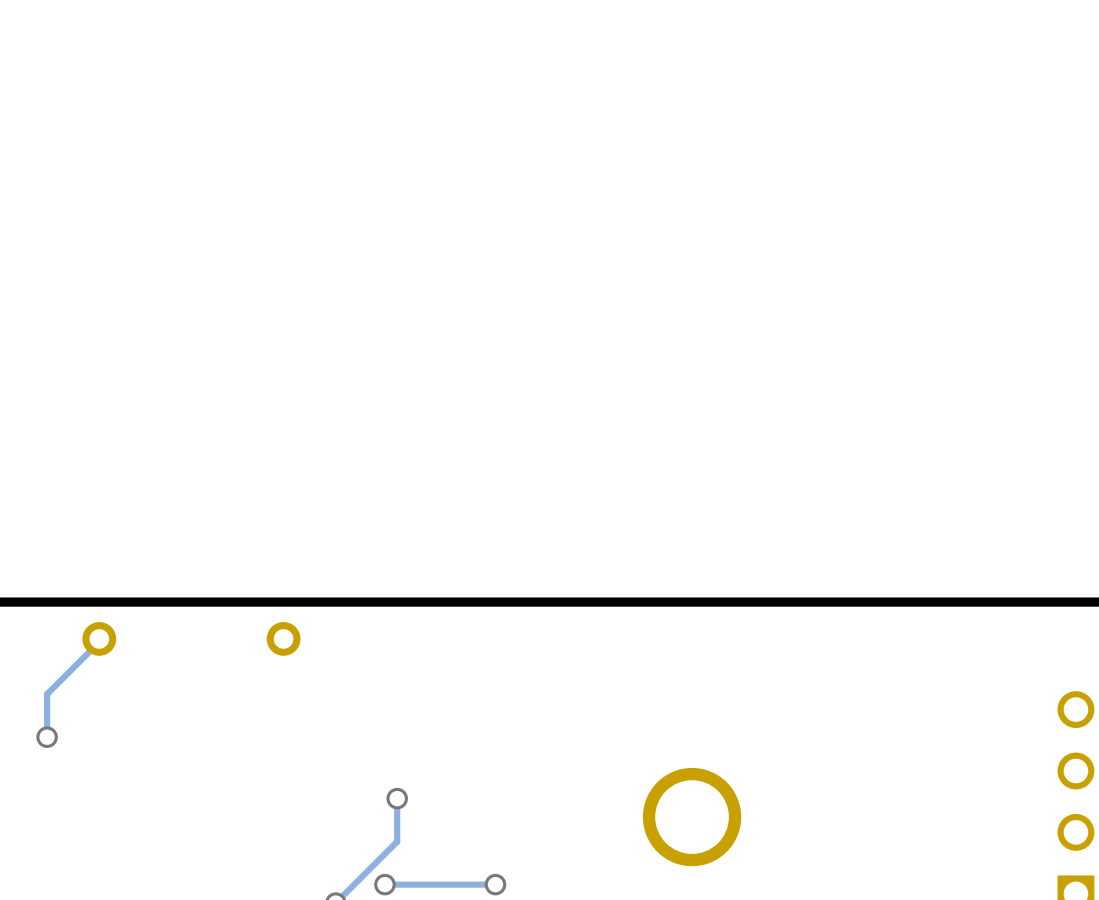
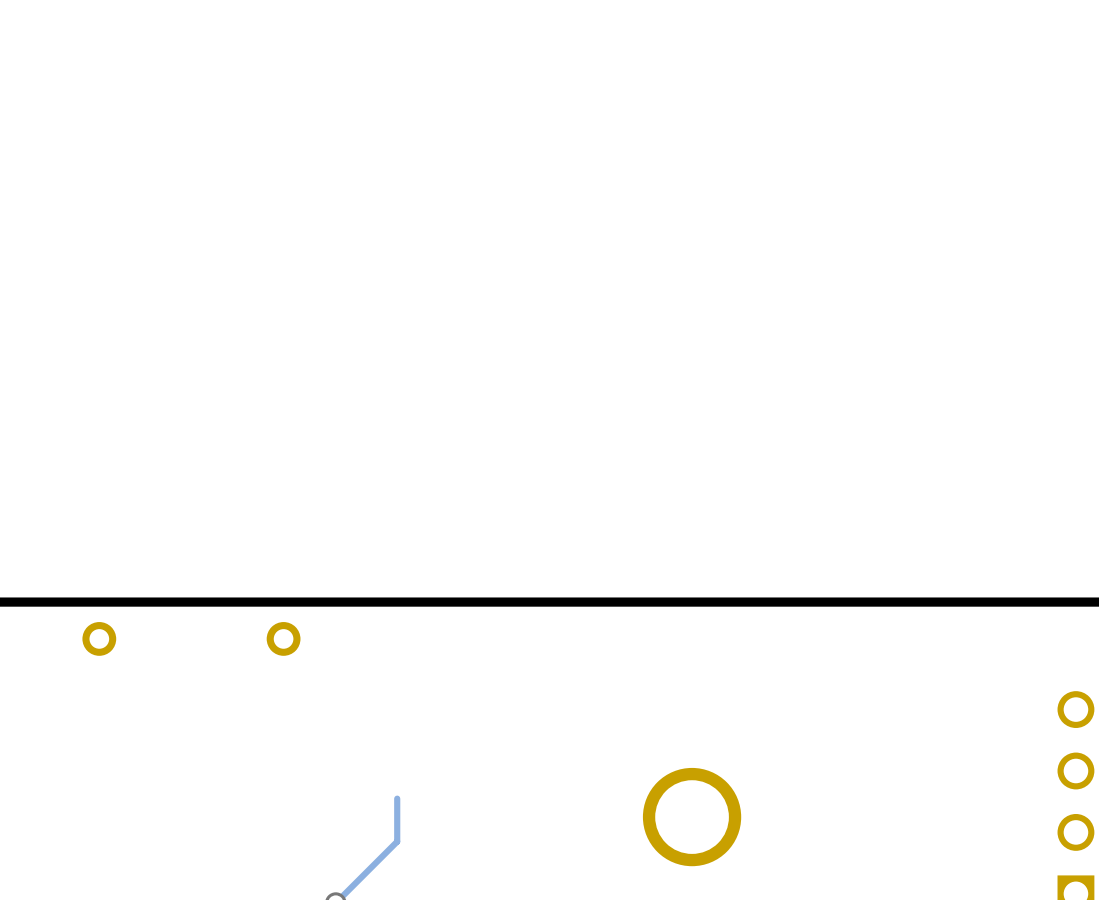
track: (99, 638) (99, 642) (47, 694) (47, 737) -> none
via: (47, 737) -> none
via: (397, 798) -> none
via: (384, 884) -> none
track: (495, 884) (384, 884) -> none
via: (495, 884) -> none

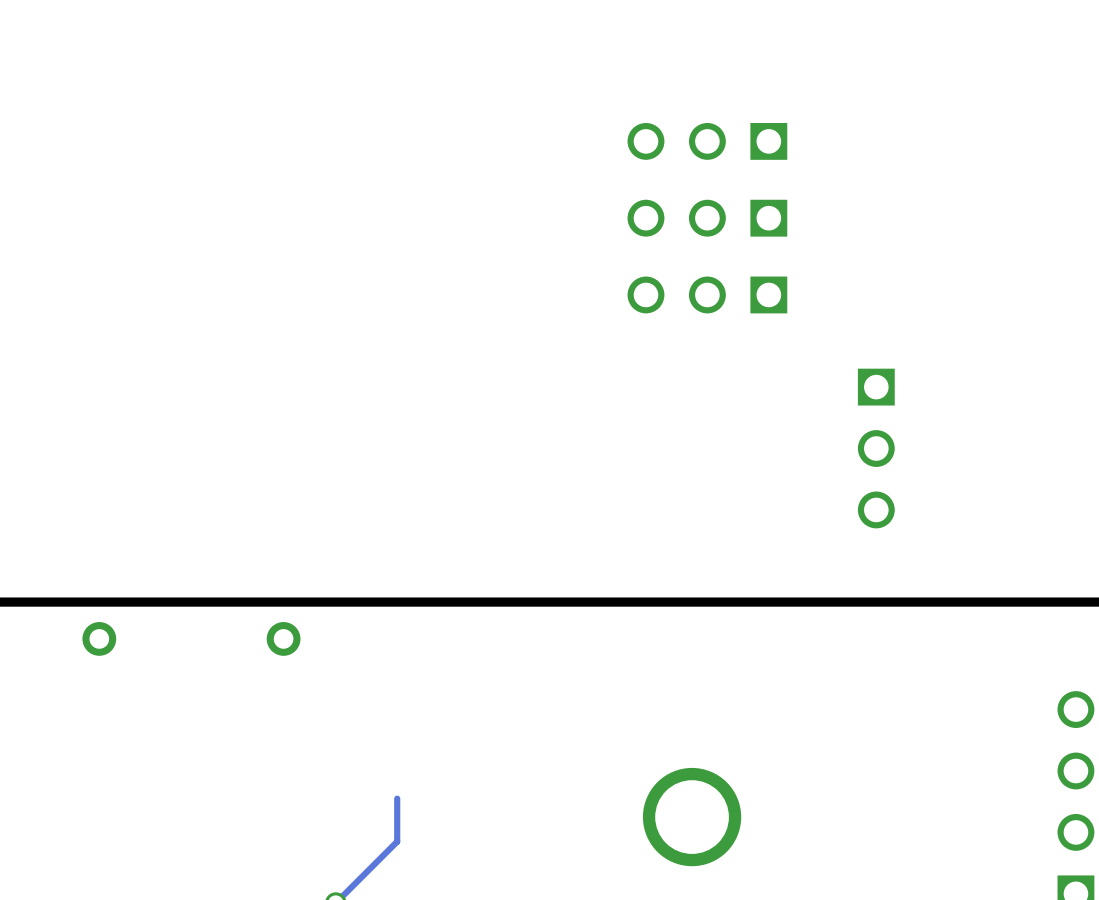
part: none -> (707, 141)
part: none -> (707, 218)
part: none -> (707, 294)
part: none -> (876, 448)

